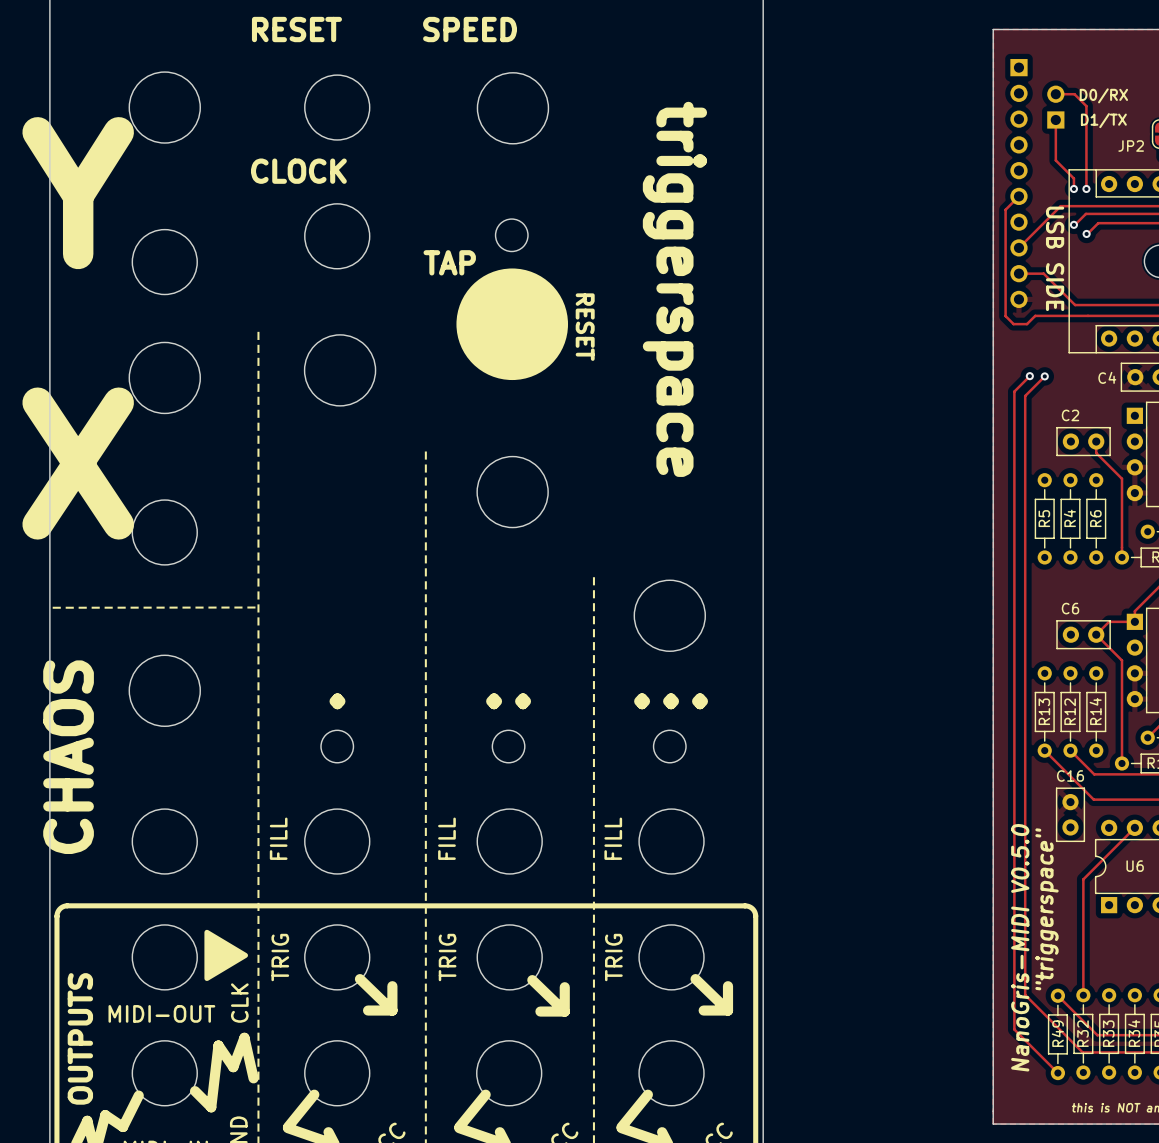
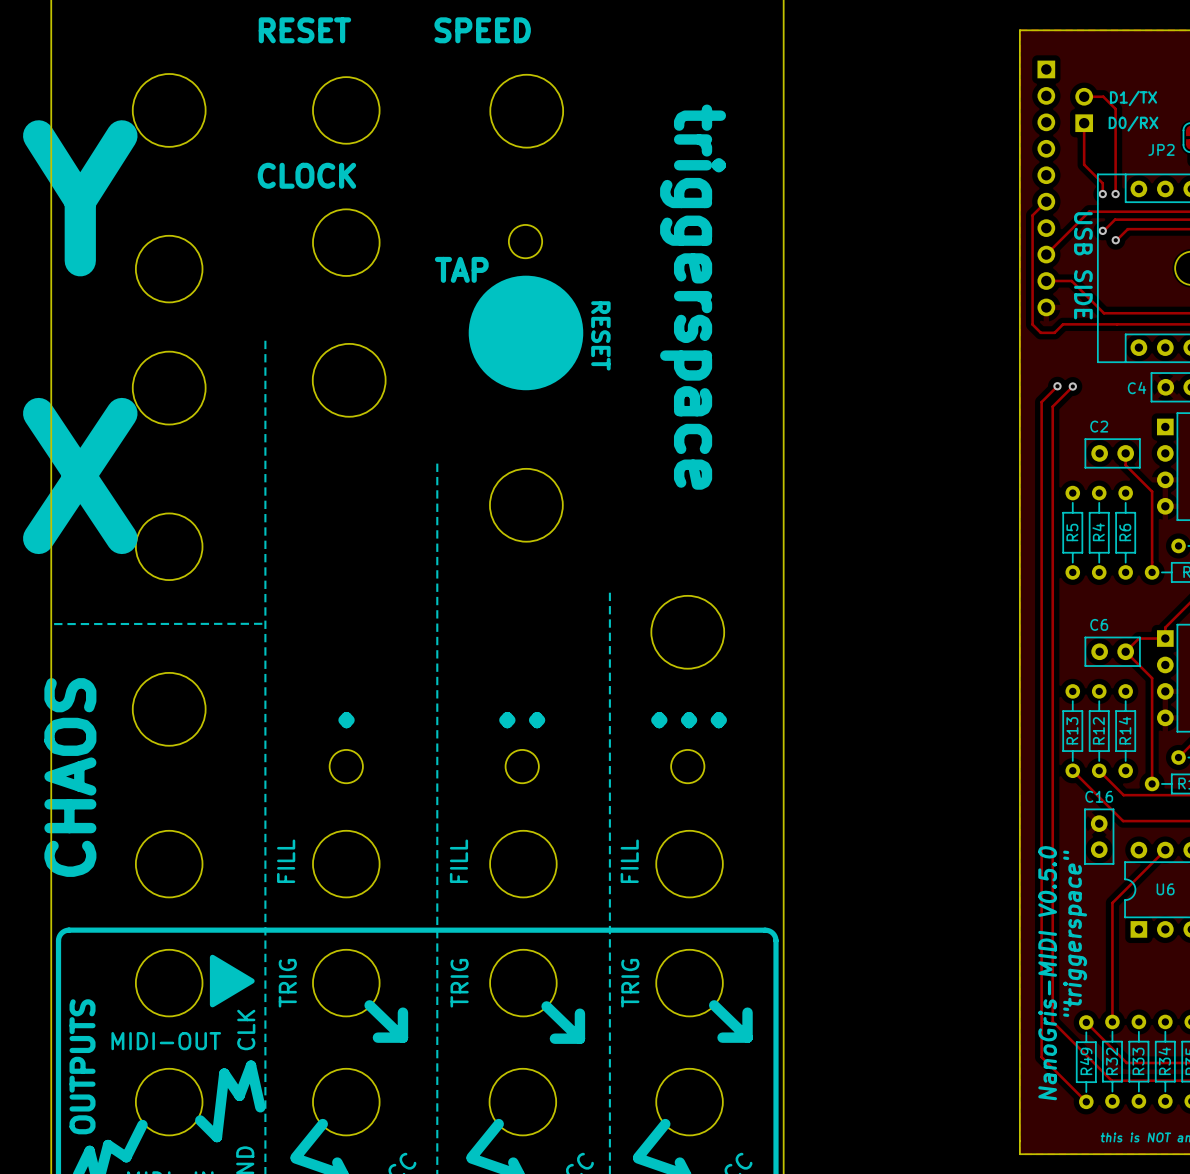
text: D0/RX (1103, 95) -> D1/TX (1133, 98)
text: D1/TX (1103, 120) -> D0/RX (1133, 123)

